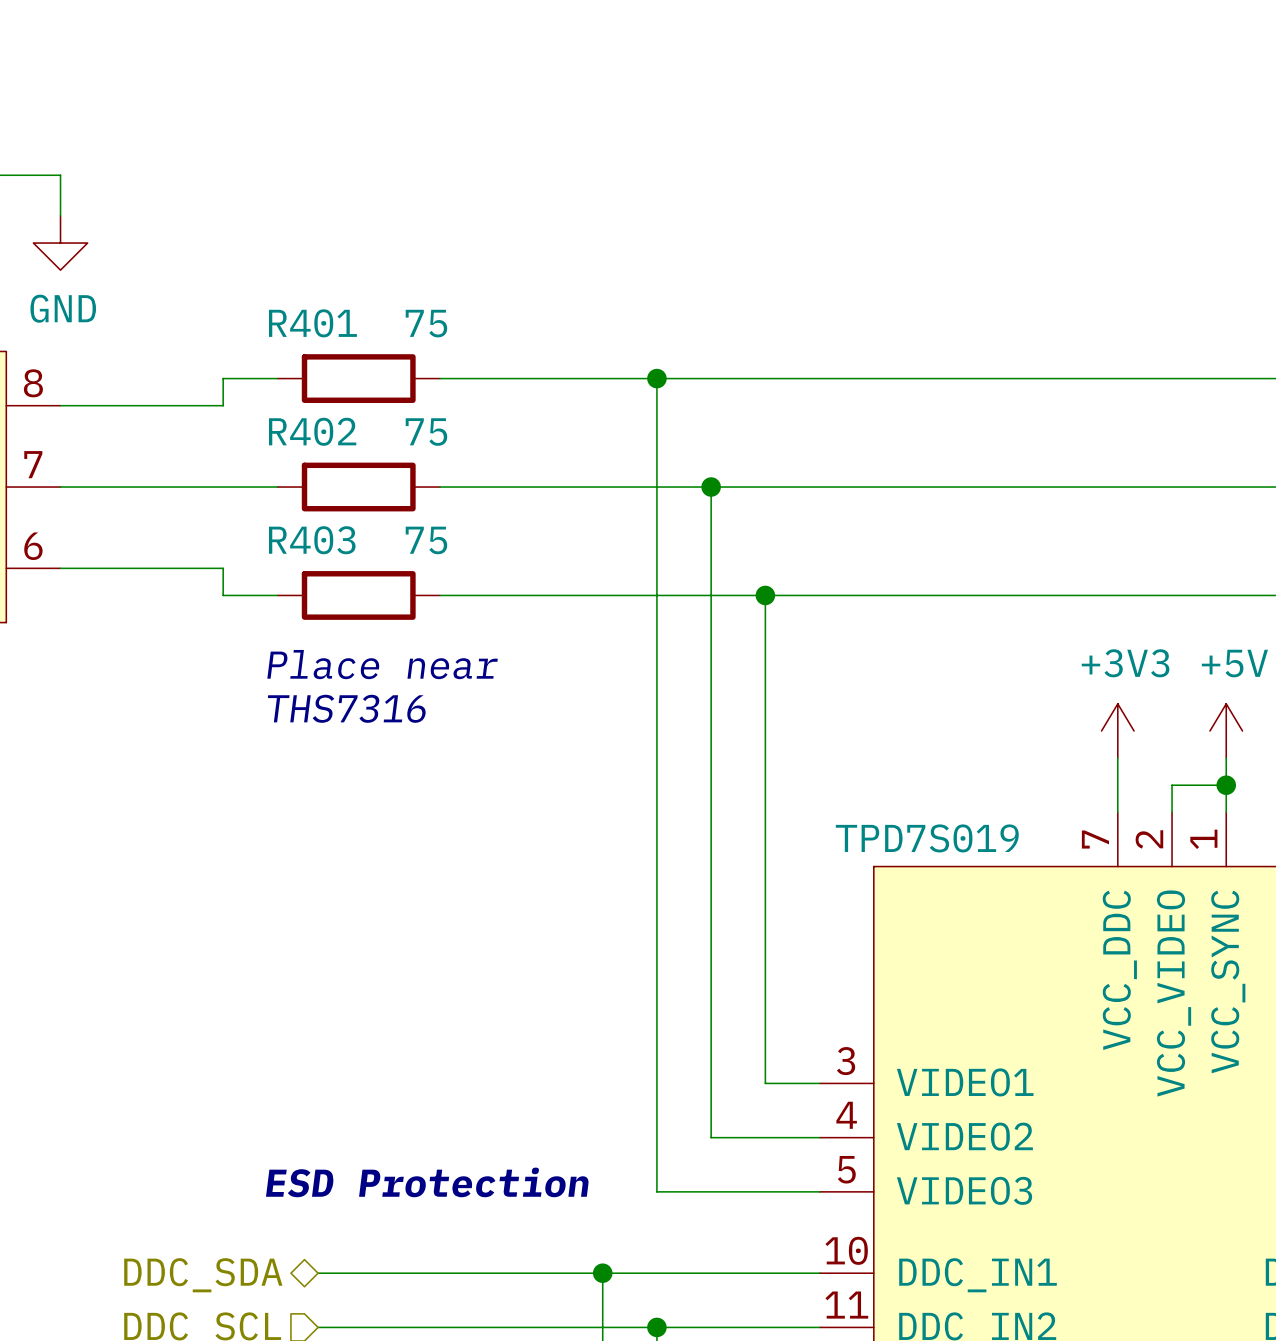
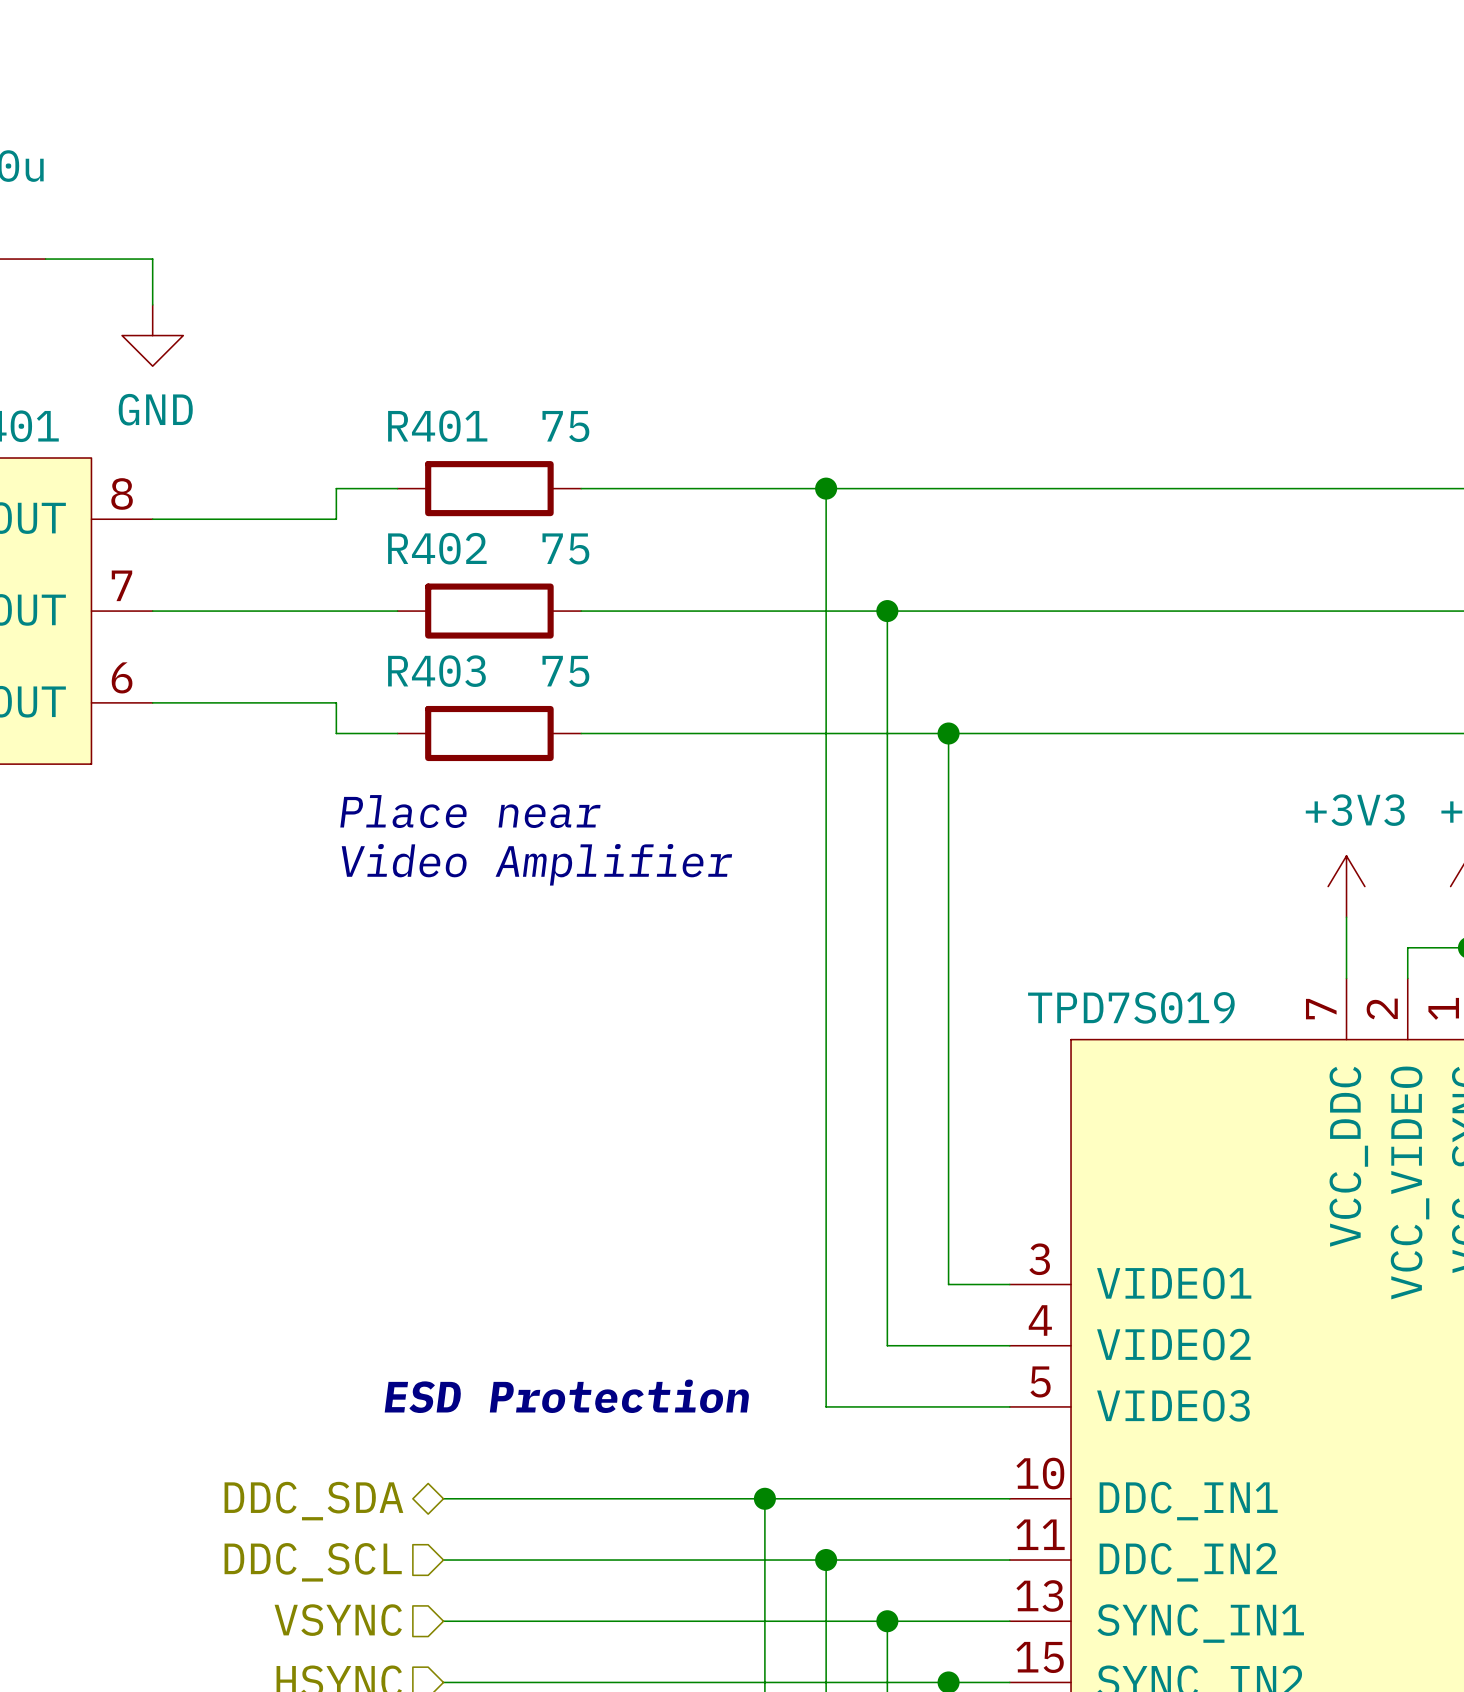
text position: Place near (382, 664) -> Place near (470, 811)
text: THS7316 (346, 708) -> none
text: none -> Video Amplifier (536, 864)

